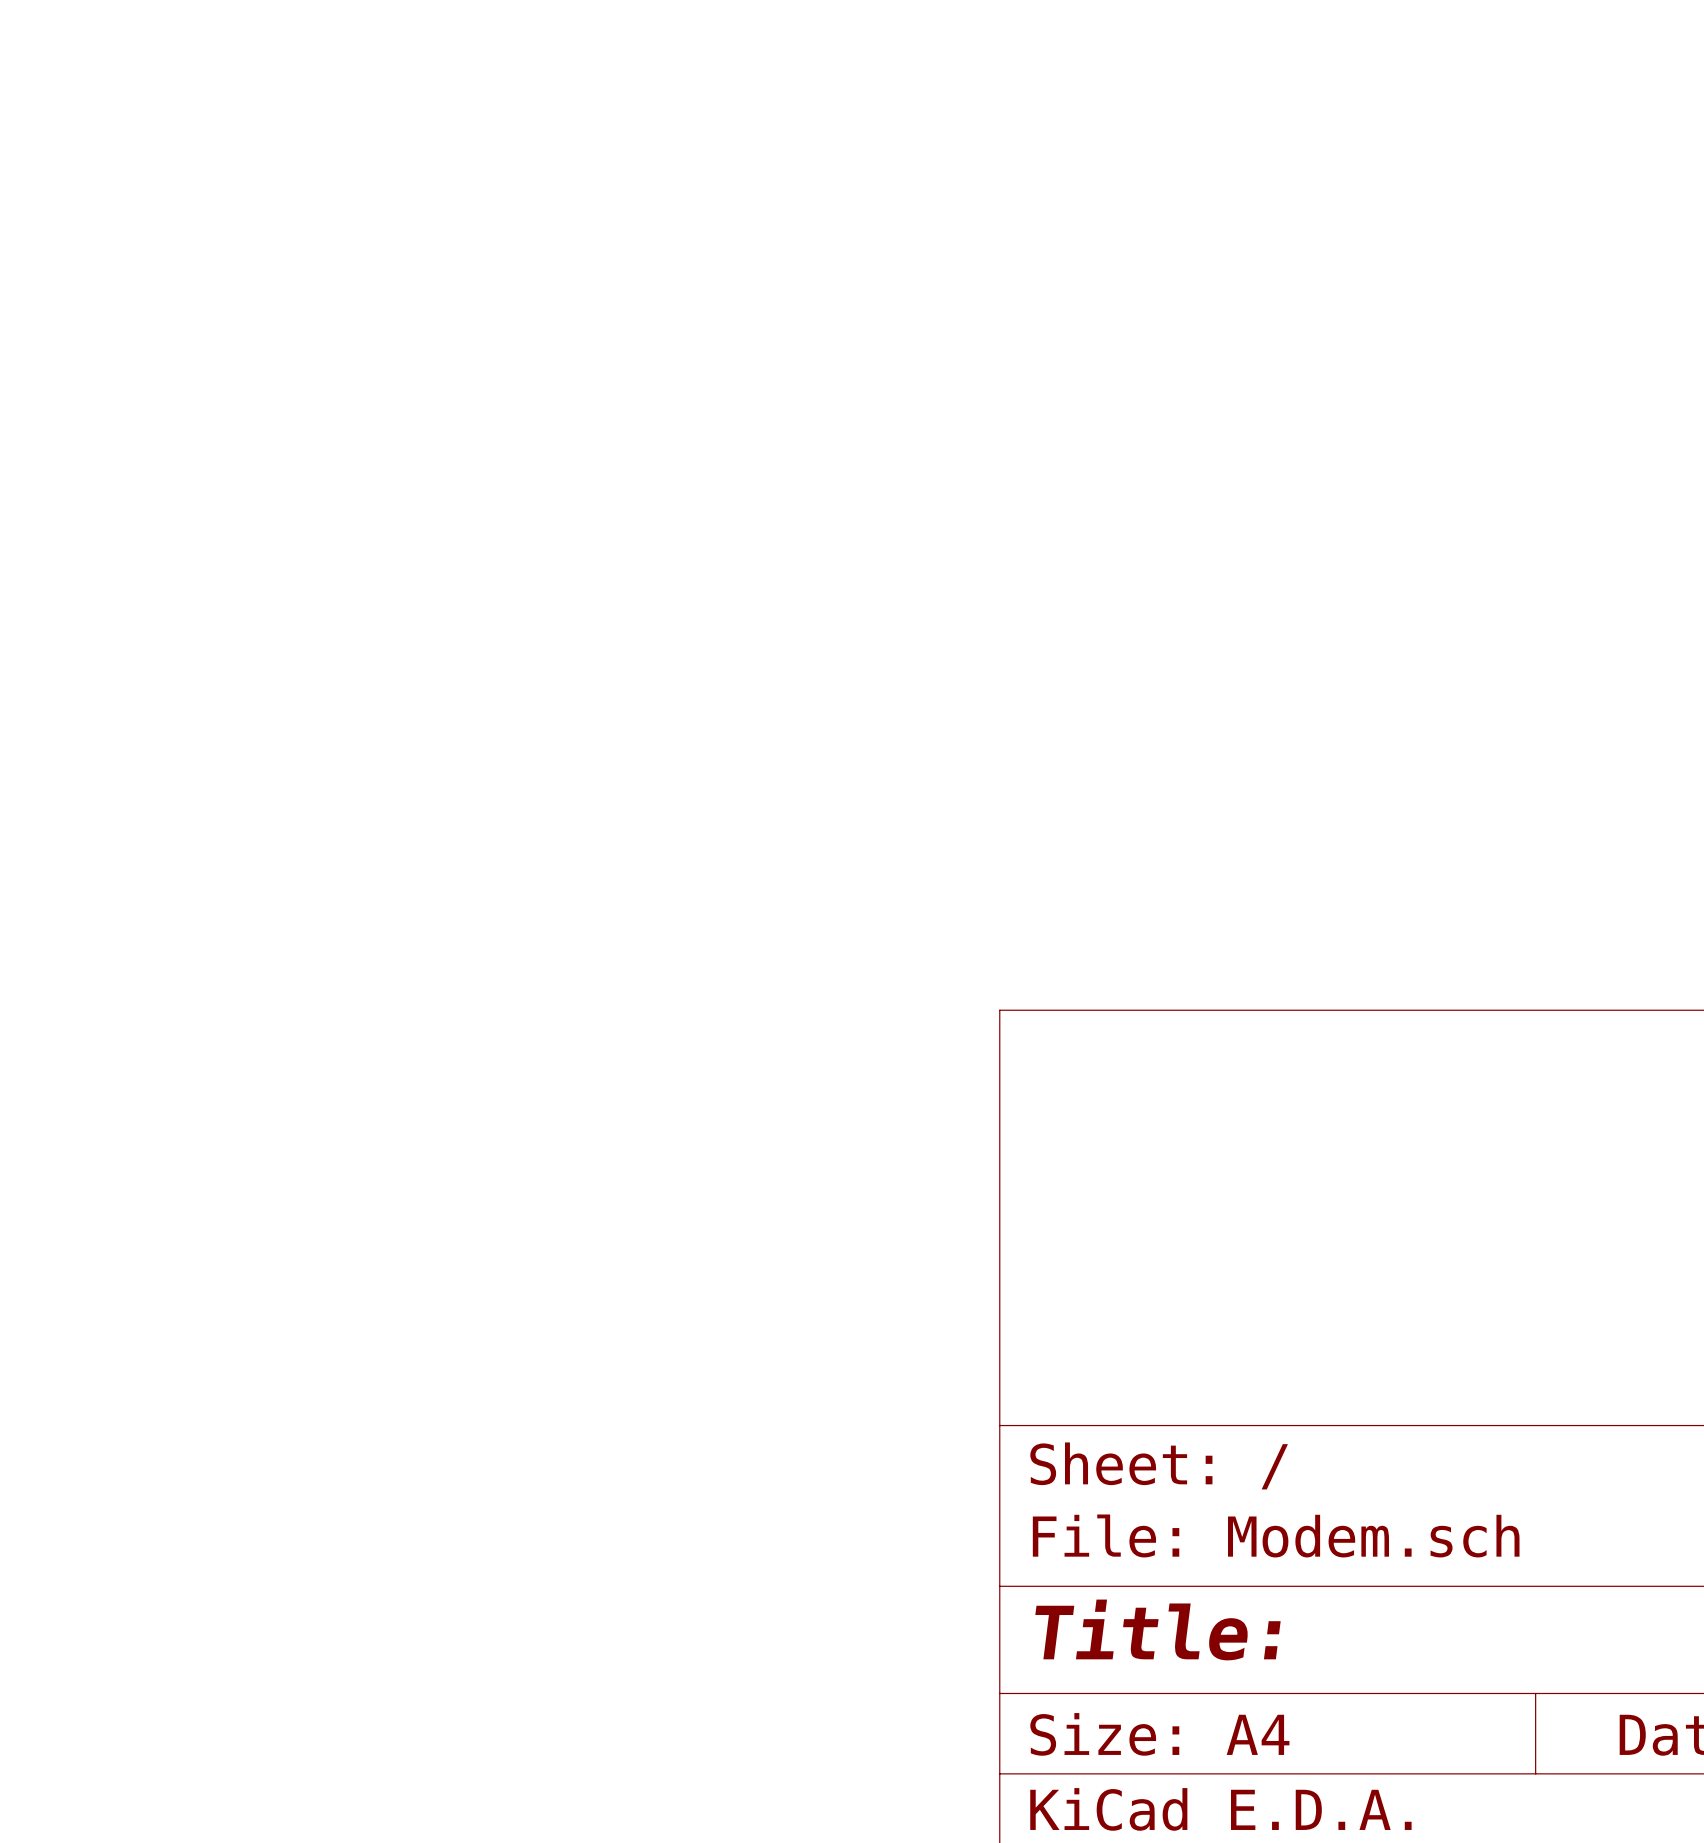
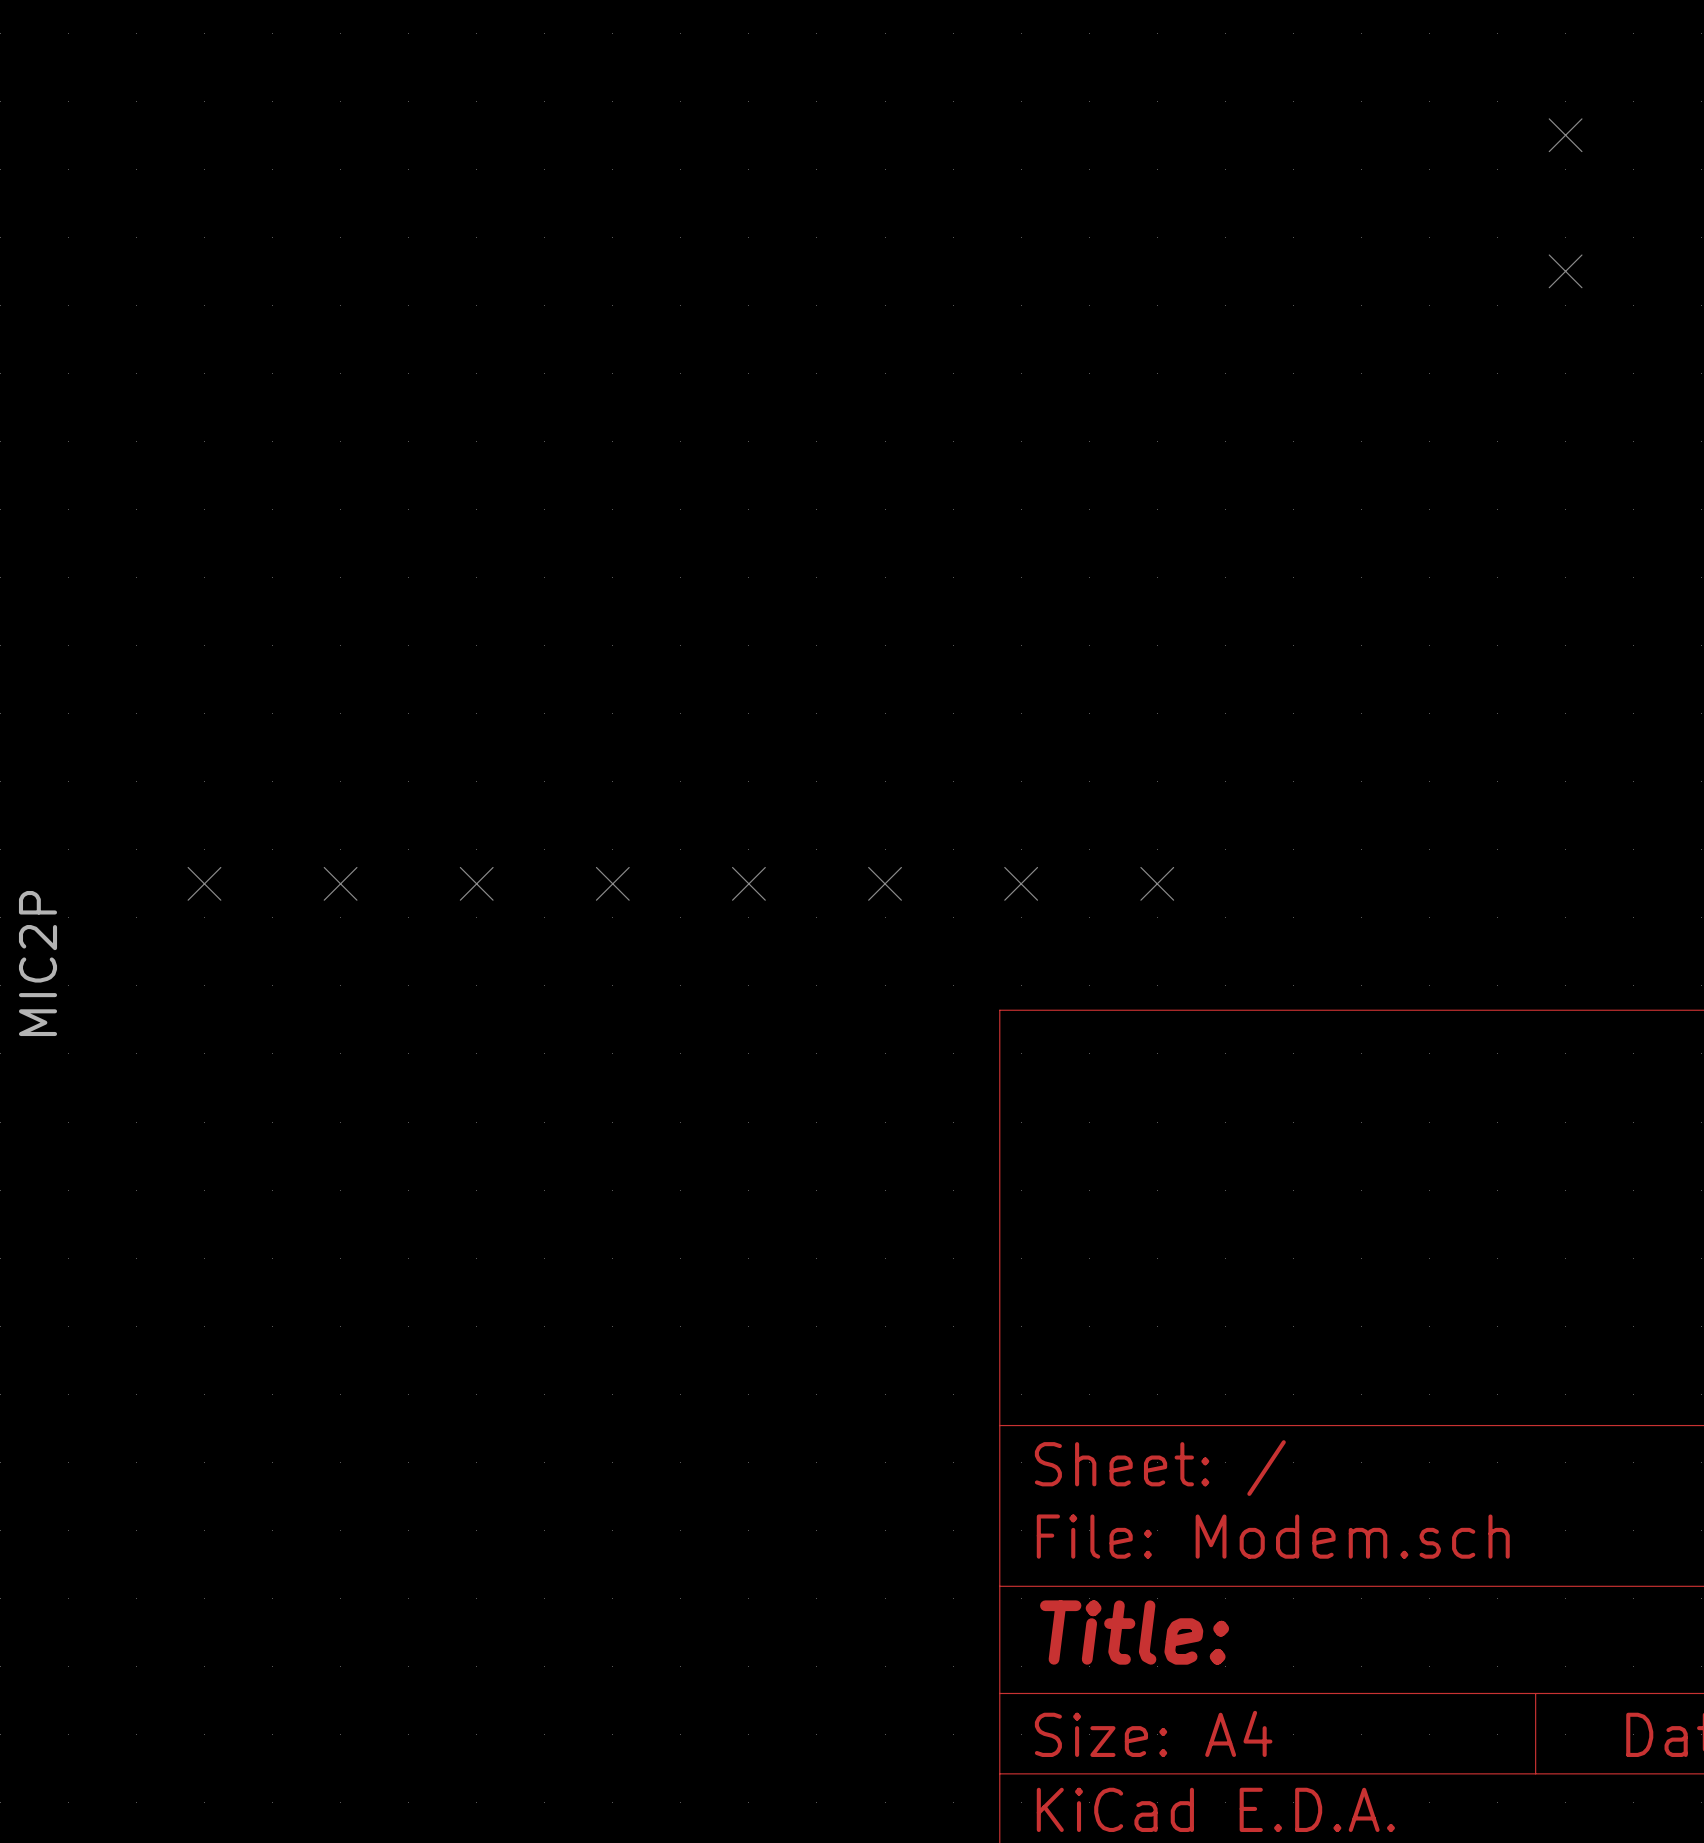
no-connect mark: none -> (1565, 135)
no-connect mark: none -> (1565, 271)
no-connect mark: none -> (204, 883)
no-connect mark: none -> (340, 883)
no-connect mark: none -> (476, 883)
no-connect mark: none -> (612, 883)
no-connect mark: none -> (748, 883)
no-connect mark: none -> (885, 883)
no-connect mark: none -> (1021, 883)
no-connect mark: none -> (1157, 883)
label: none -> MIC2P (37, 963)

